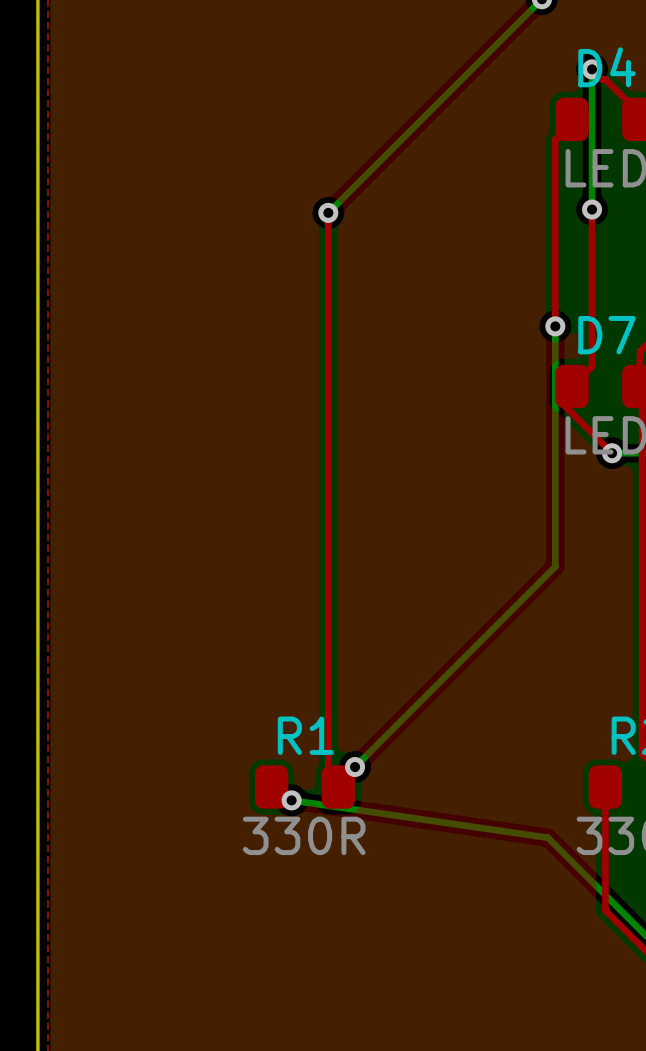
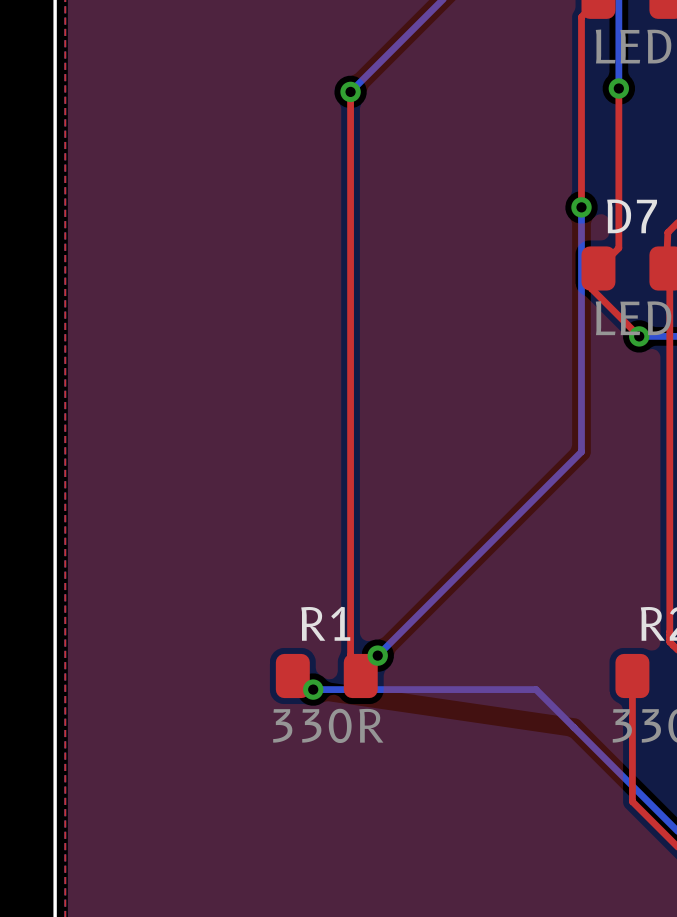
bottom track: (291, 800) (548, 837) -> (313, 689) (536, 689) (574, 727)

